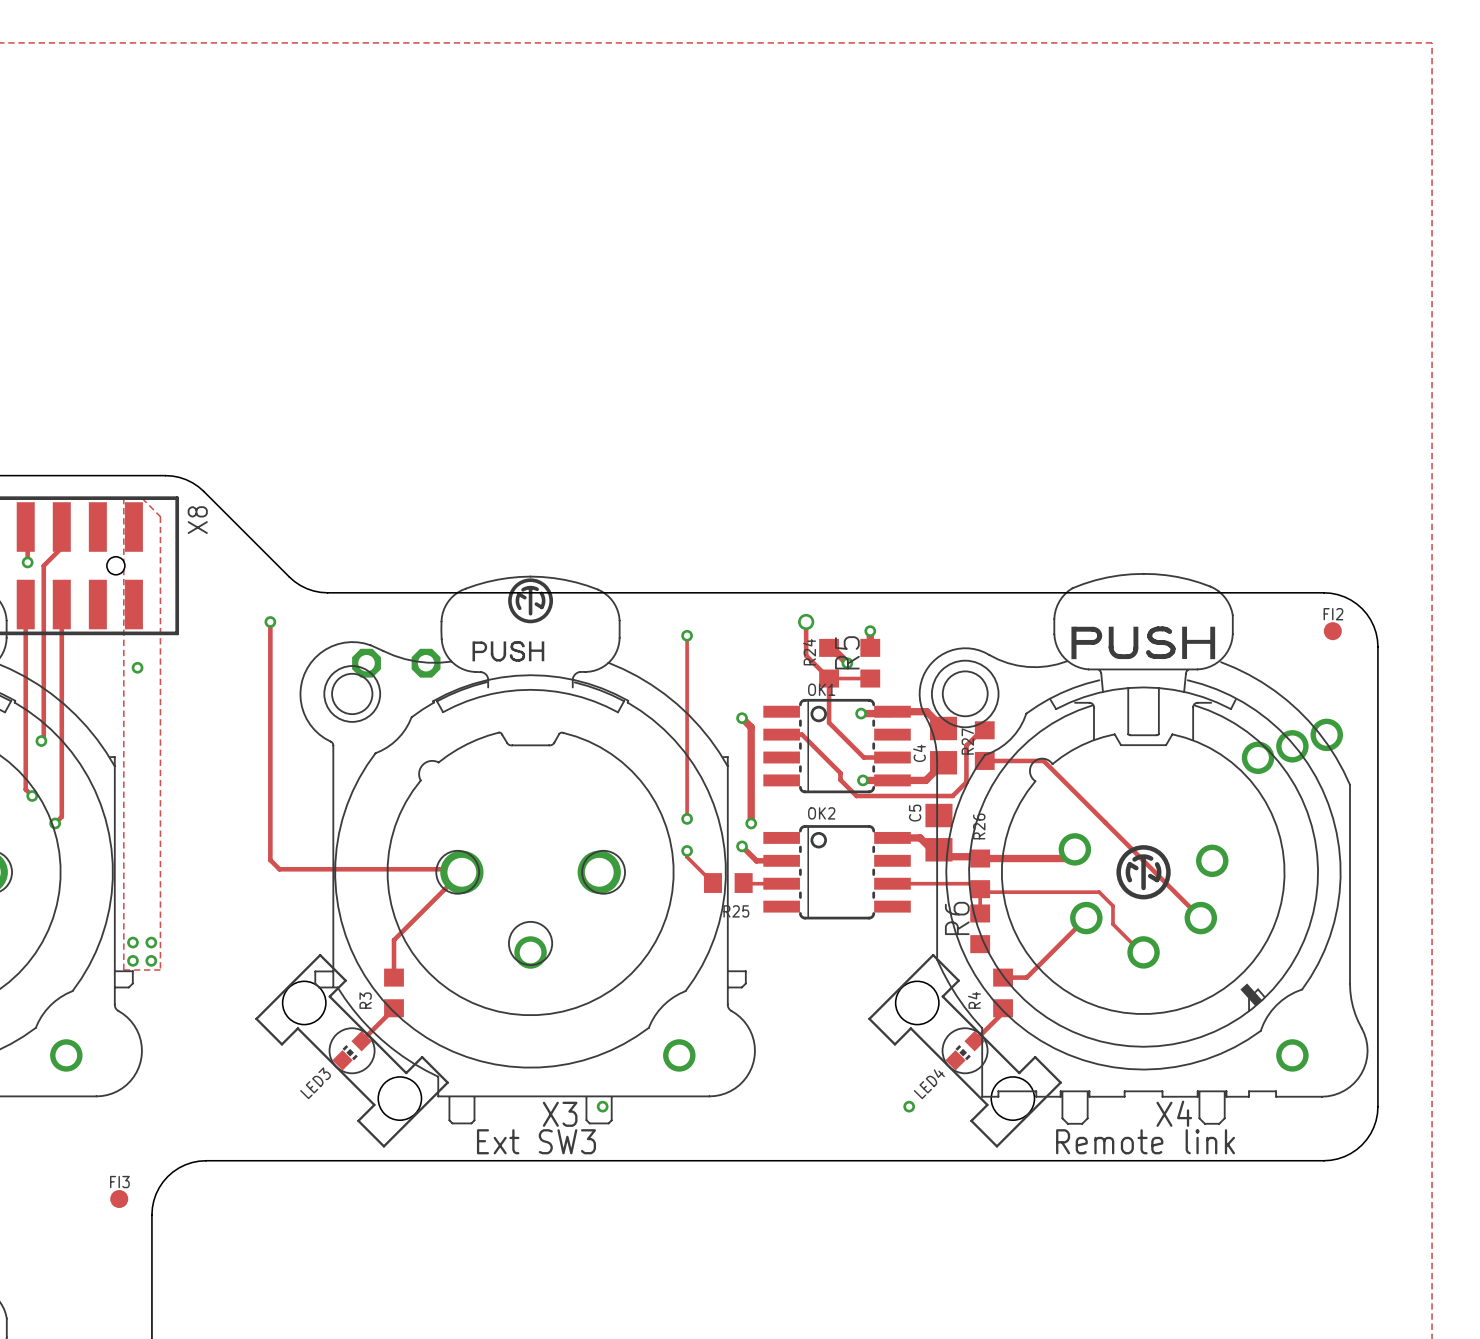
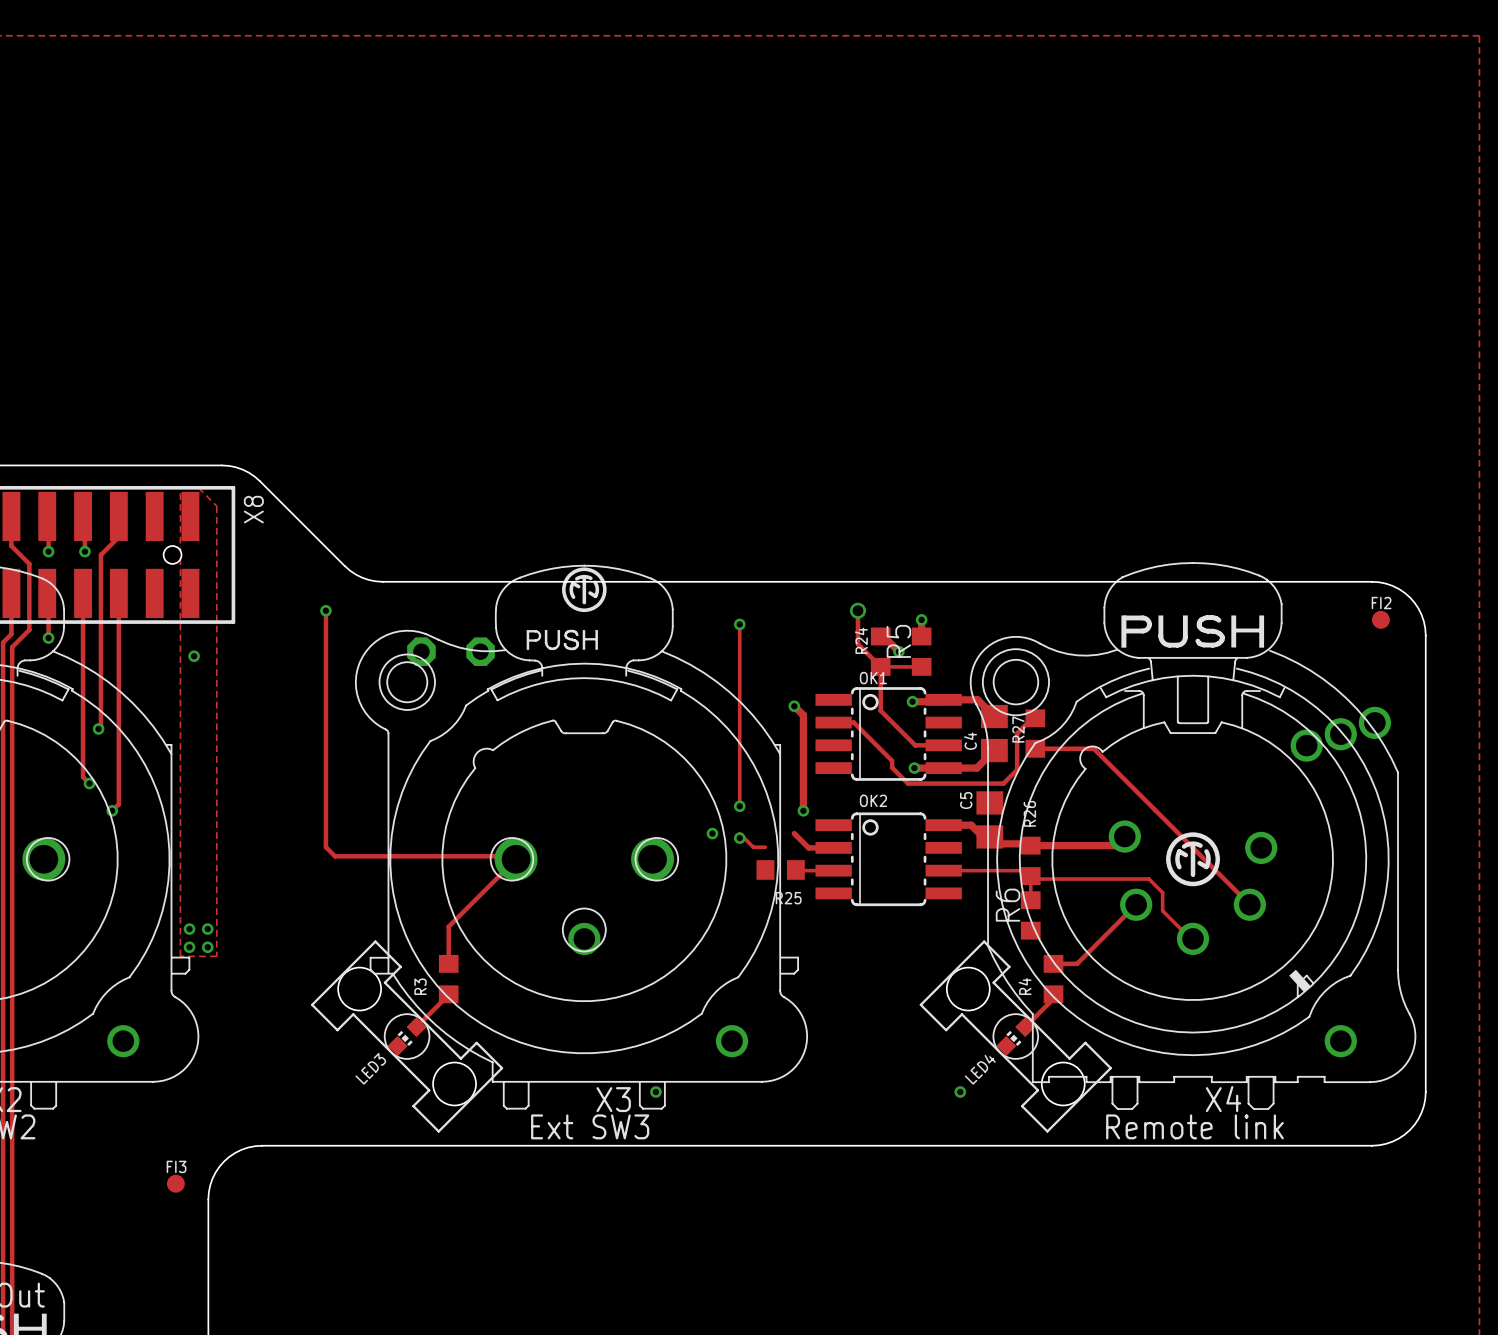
track: none -> (739, 833) (753, 847) (765, 847)
via position: (742, 846) -> (712, 833)
track: (687, 850) (687, 857) (712, 883) -> none

